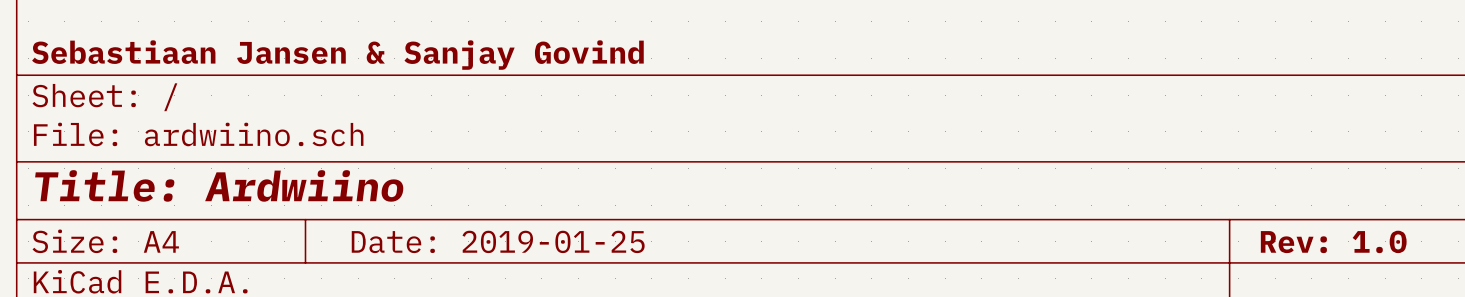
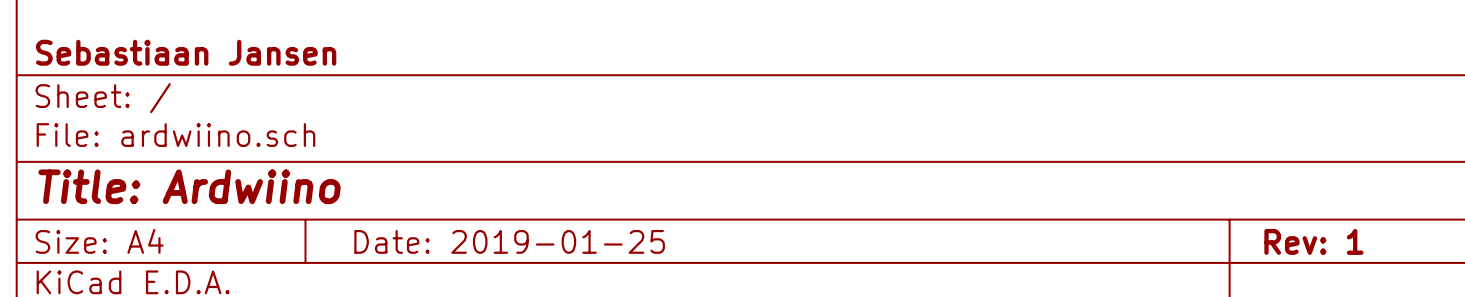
title block: Sebastiaan Jansen & Sanjay Govind (337, 55) -> Sebastiaan Jansen (186, 52)
title block: Rev: 1.0 (1333, 241) -> Rev: 1 (1313, 241)

